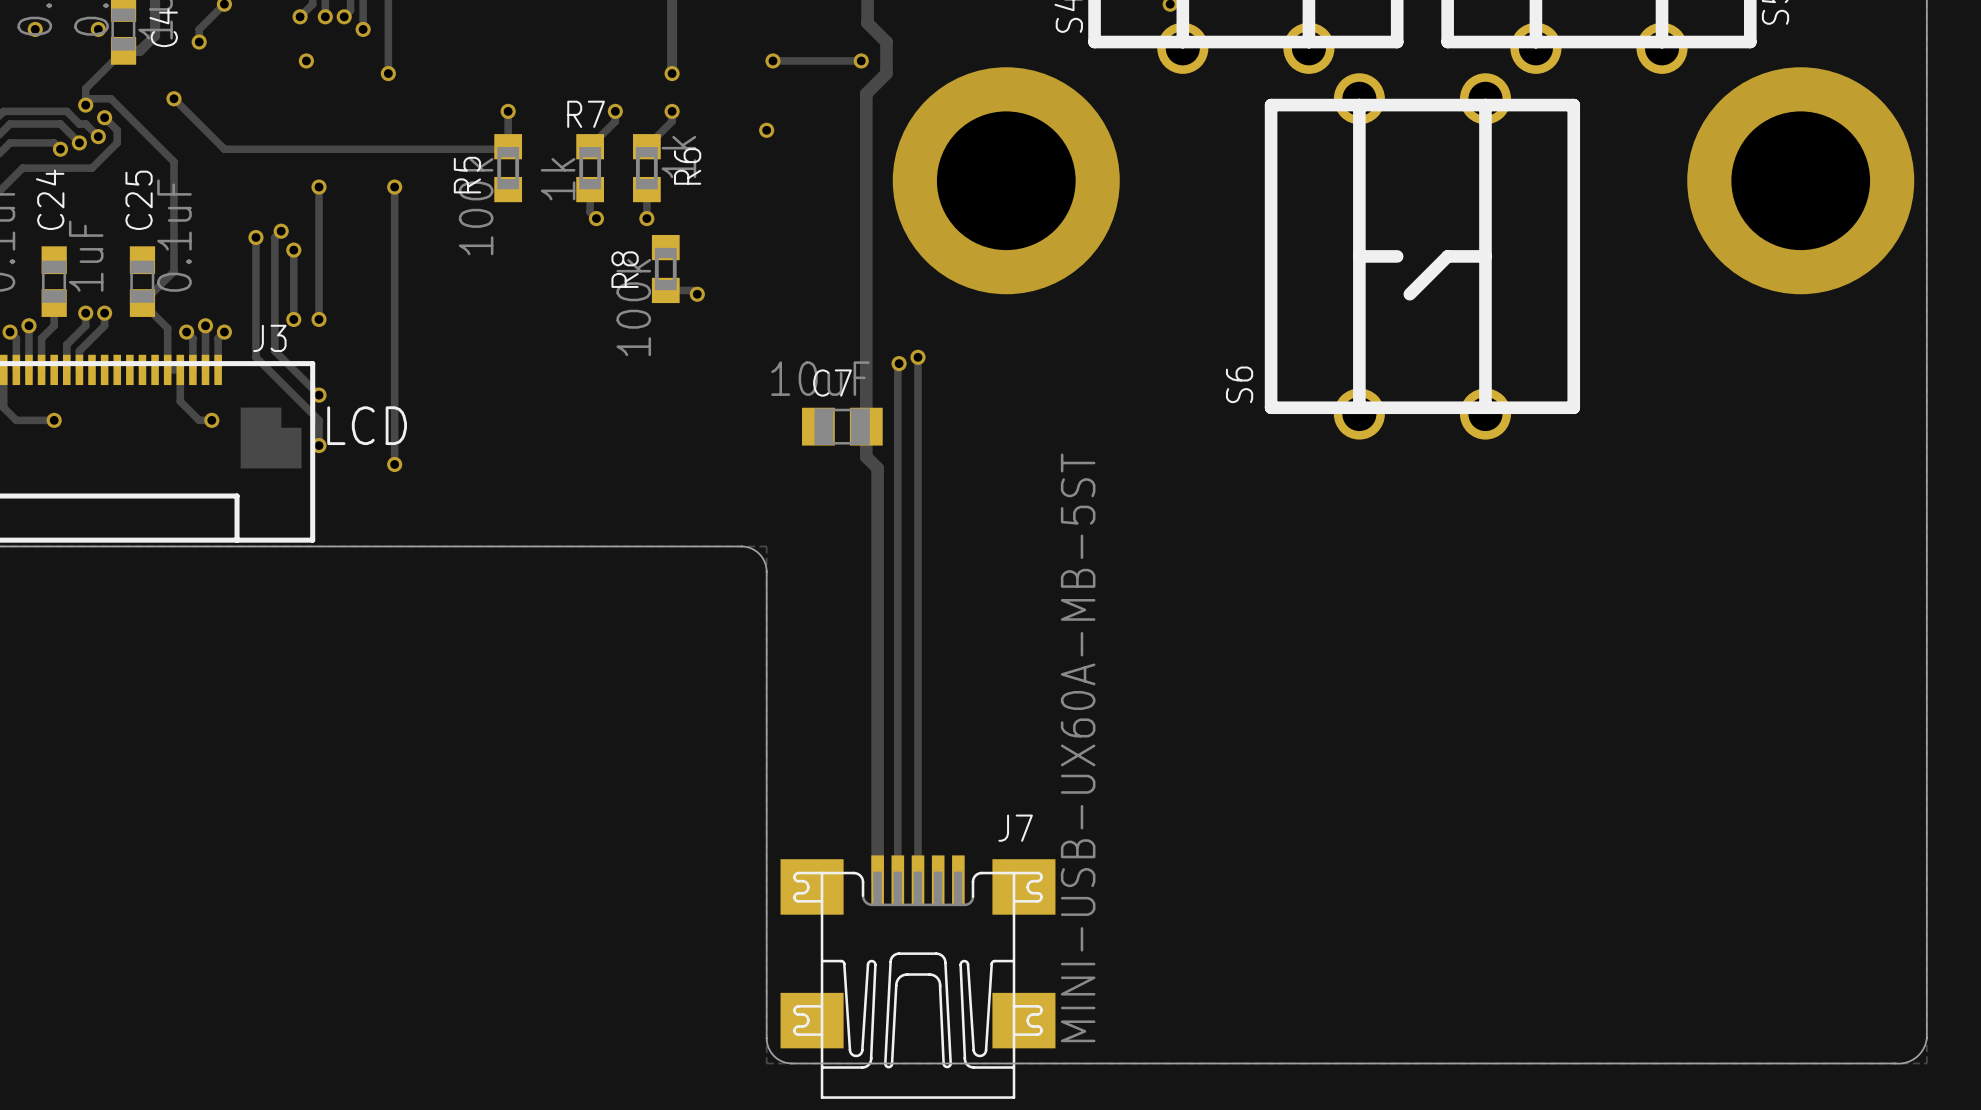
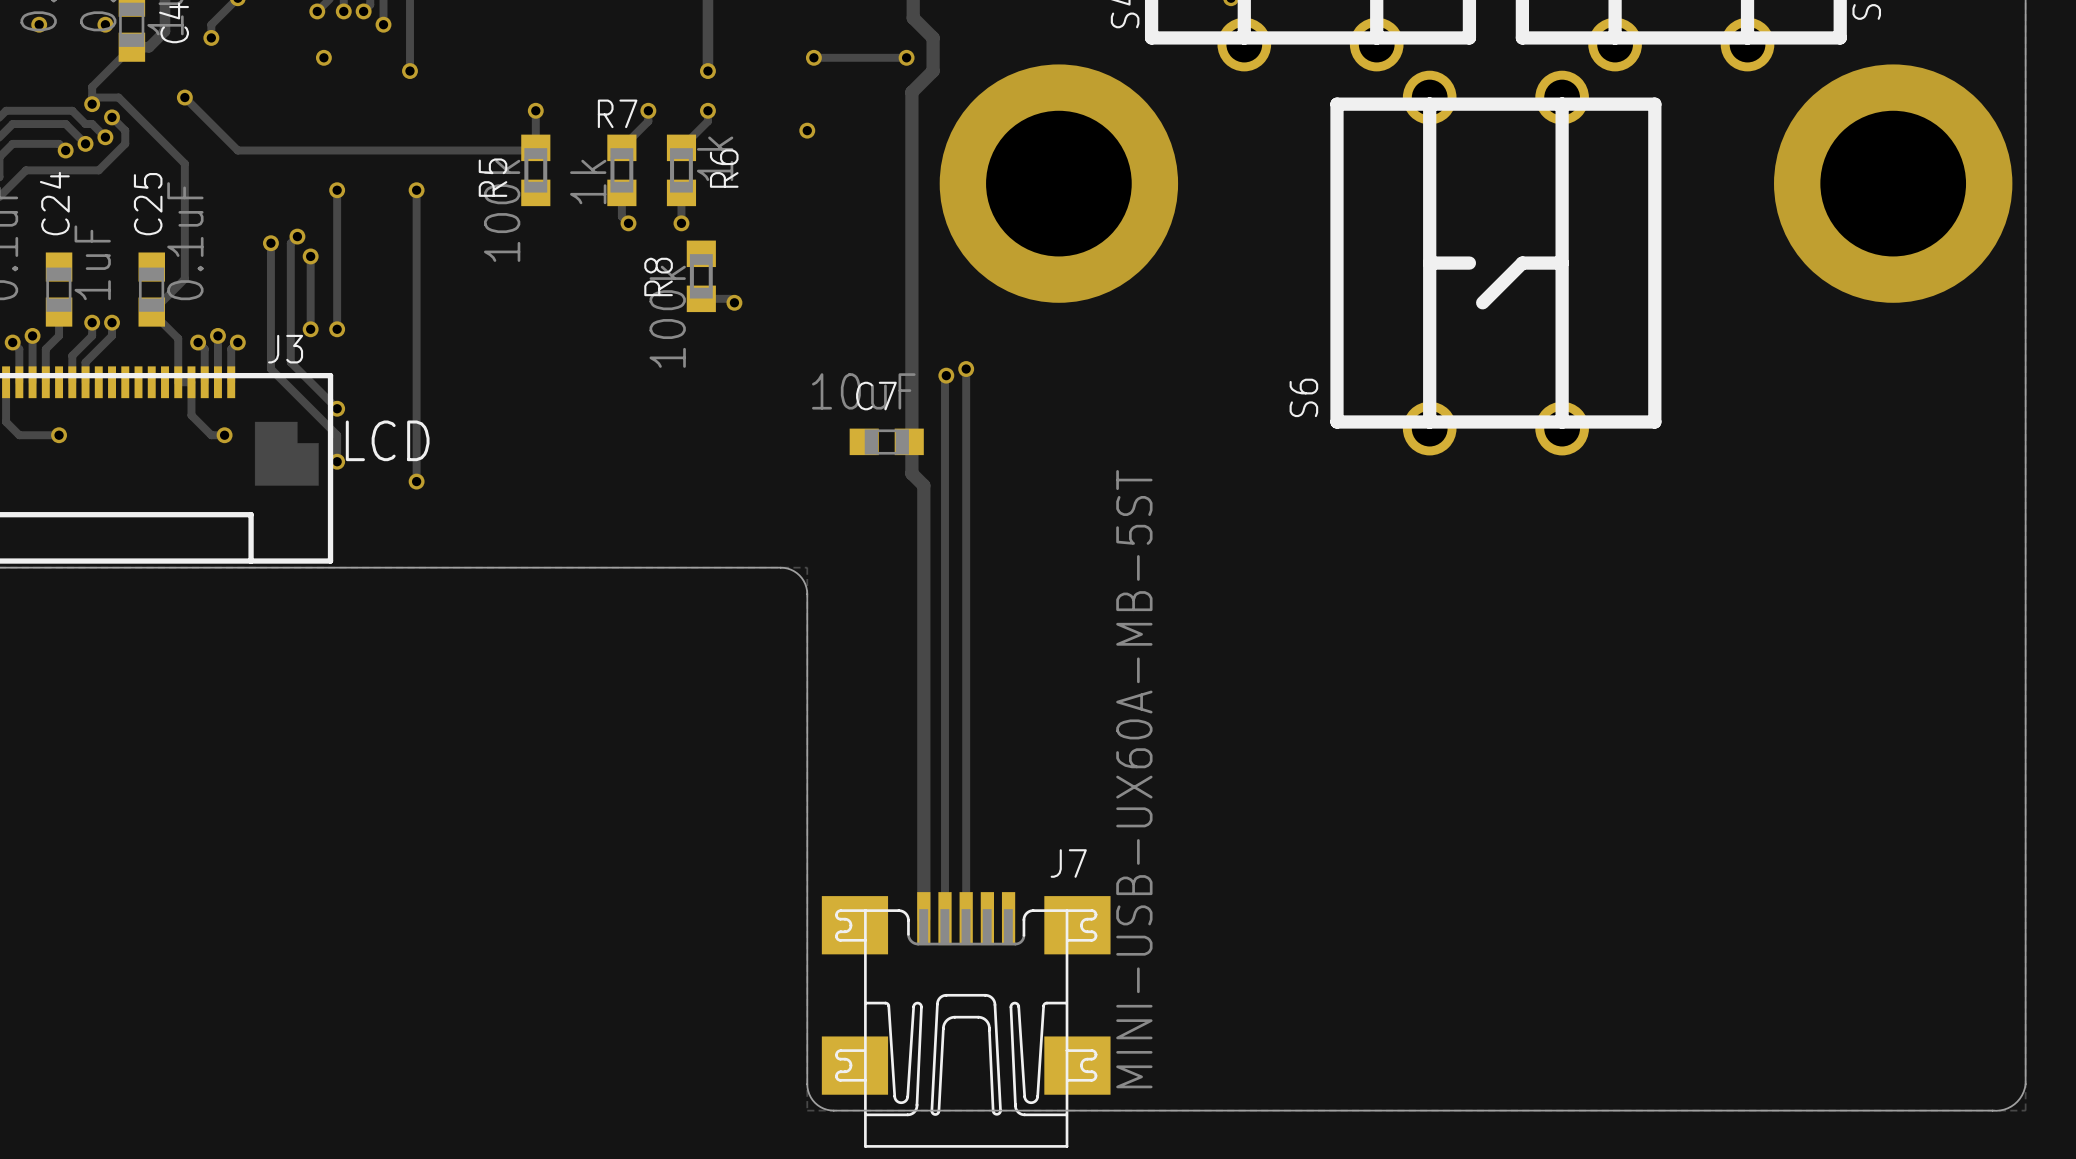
C7 footprint: [801, 407, 883, 446] -> [849, 428, 924, 456]

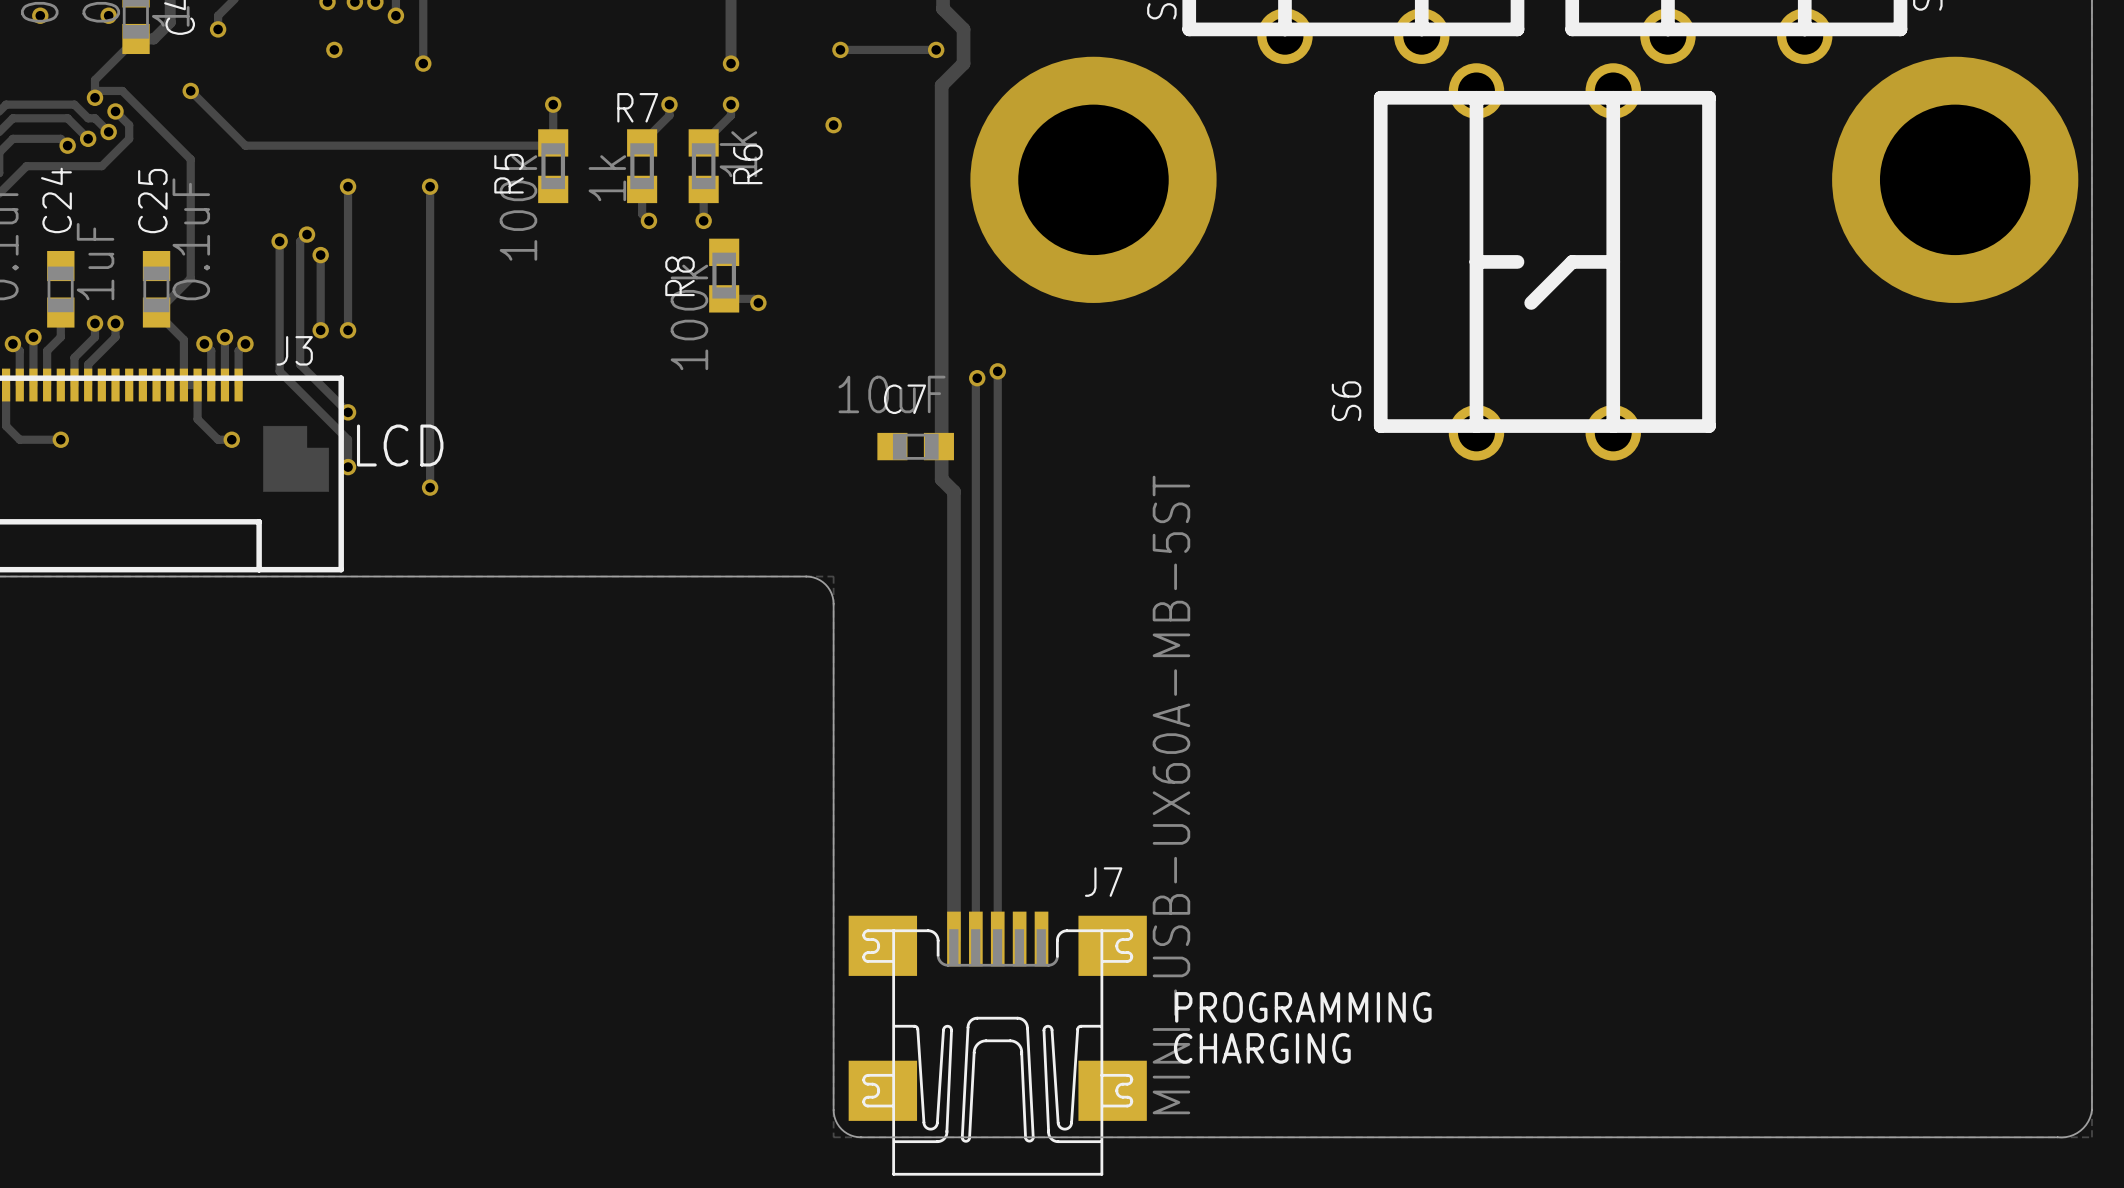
text: none -> PROGRAMMING (1303, 1007)
text: none -> CHARGING (1262, 1048)

